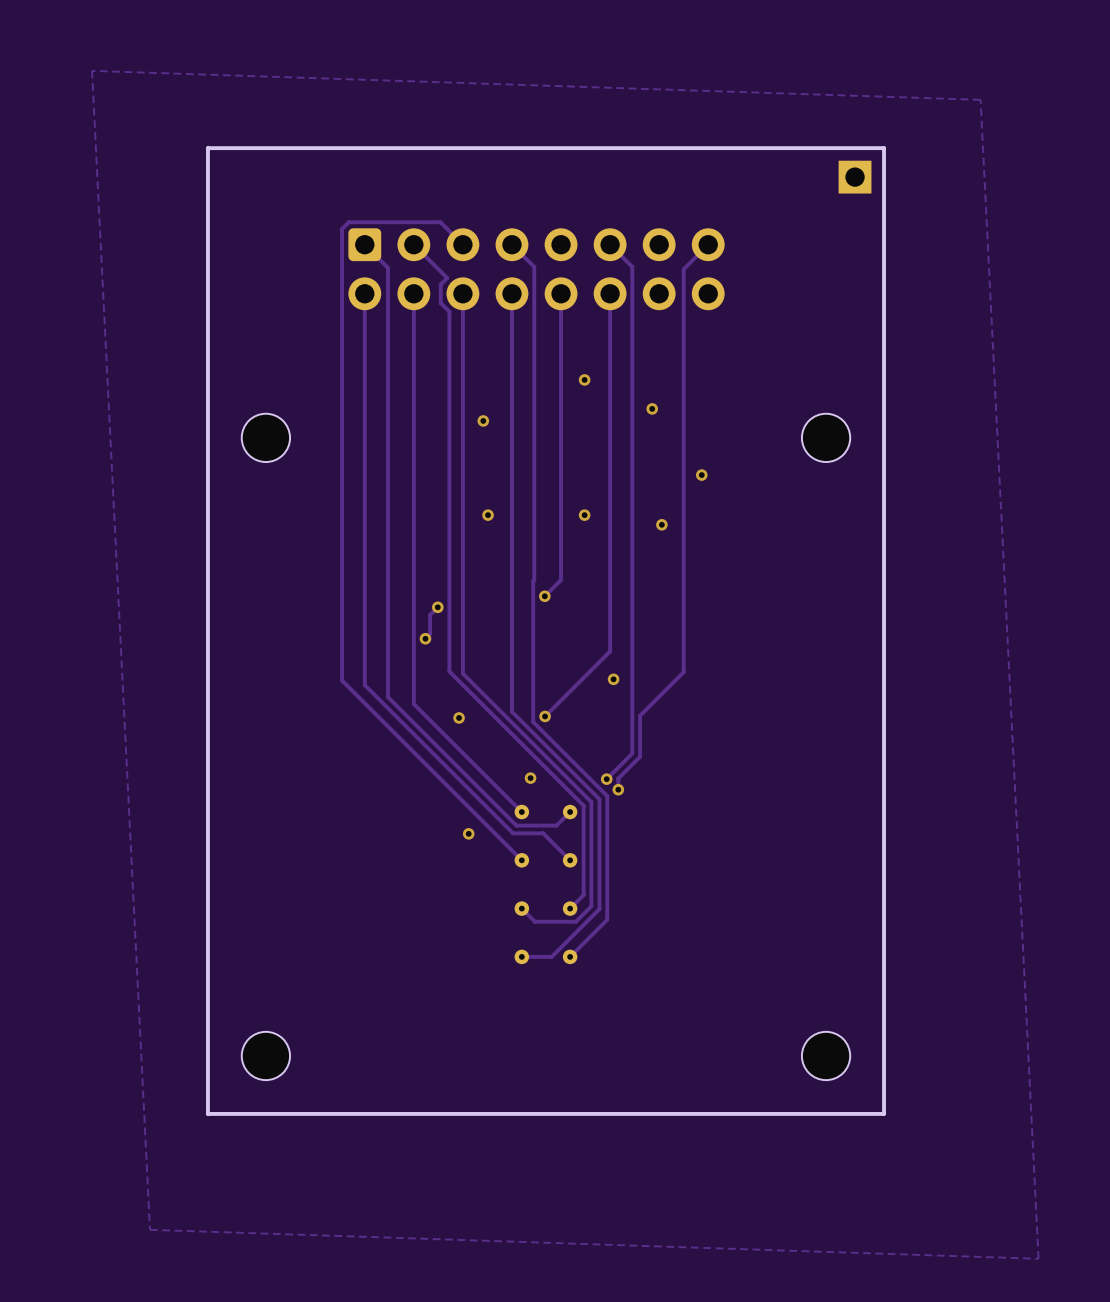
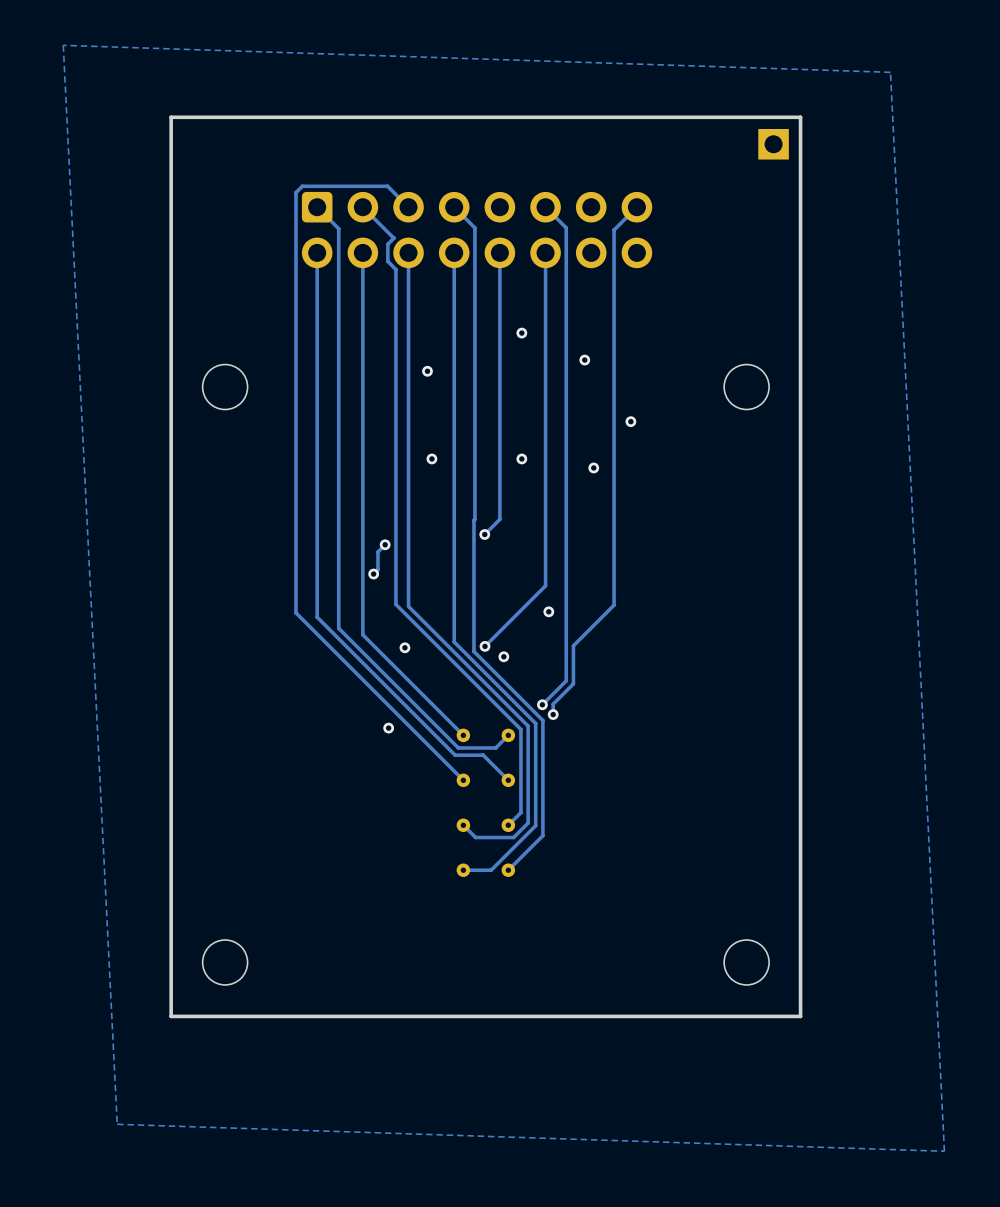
via: none -> (503, 656)
via: (530, 778) -> none
via position: (468, 833) -> (388, 728)

